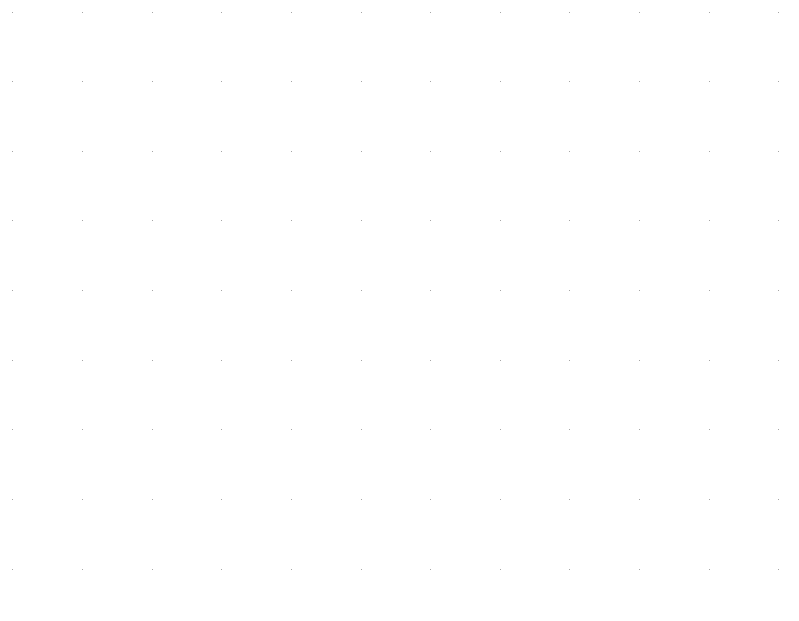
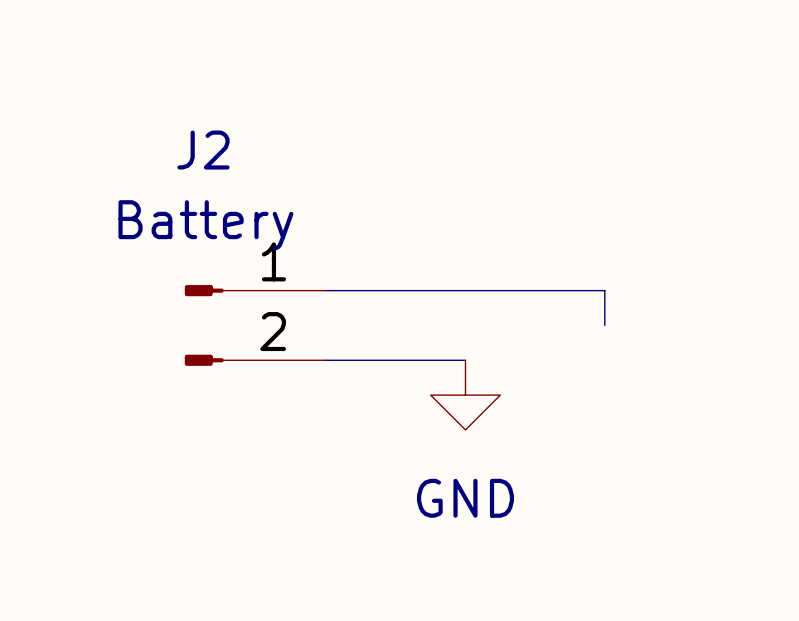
wire: none -> (326, 290) (604, 290) (604, 325)
J2: none -> Battery (255, 325)
wire: none -> (326, 360) (465, 360)
power symbol: none -> GND (465, 395)

